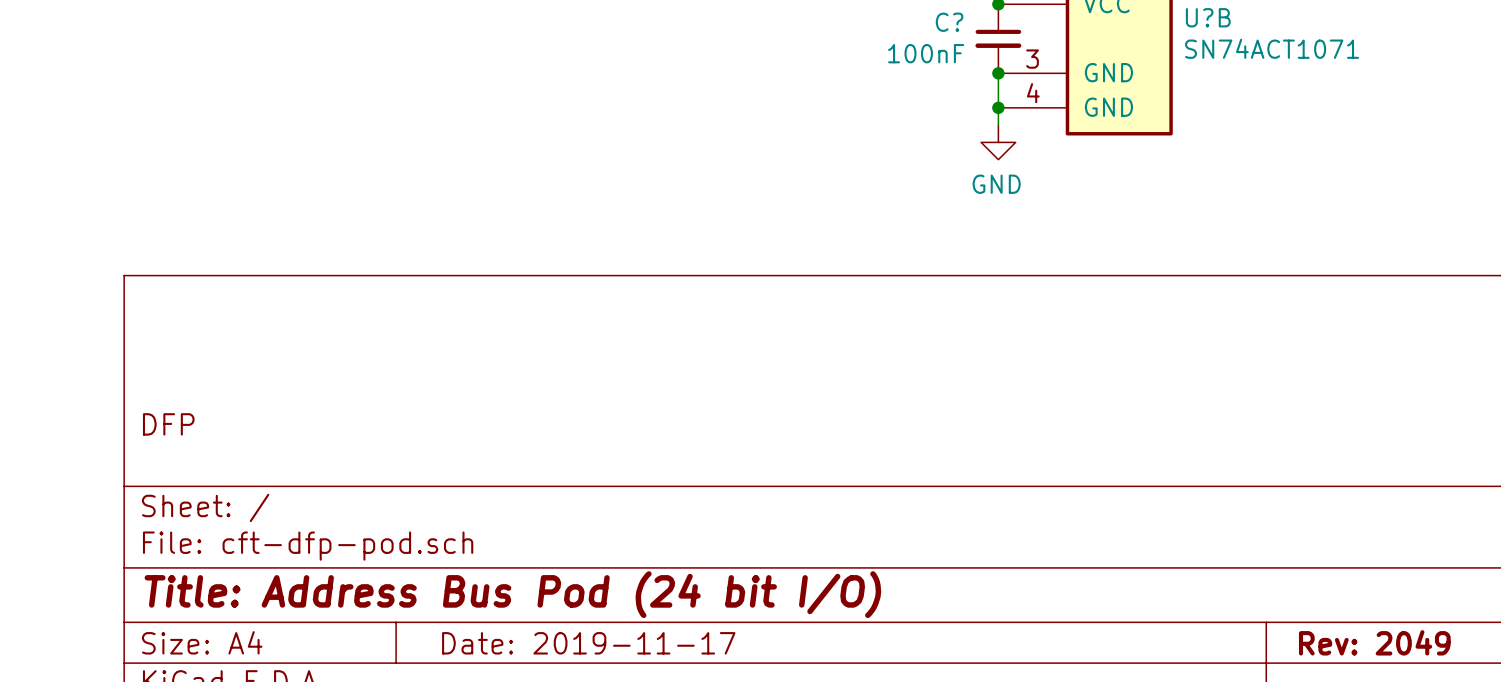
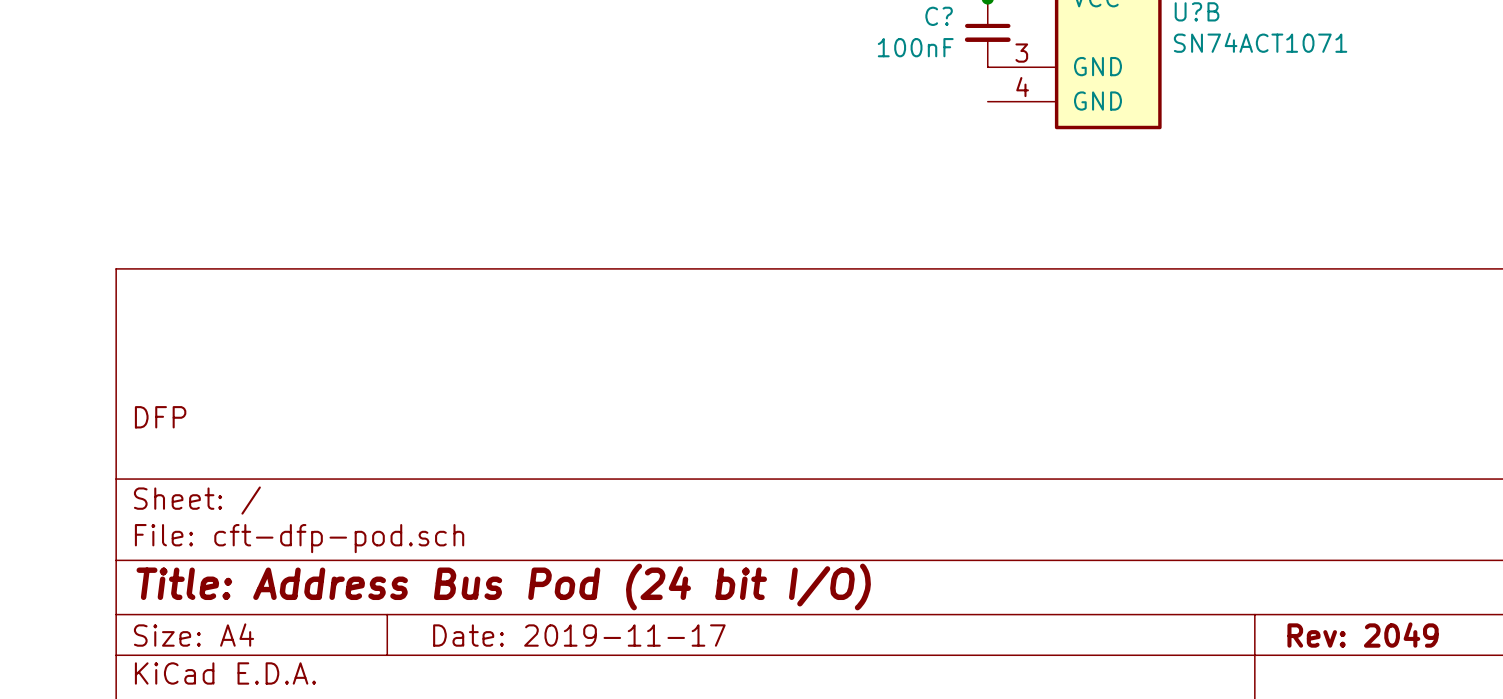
wire: (998, 73) (998, 125) -> none
junction: (998, 73) -> none
junction: (998, 107) -> none
power symbol: GND (998, 142) -> none

